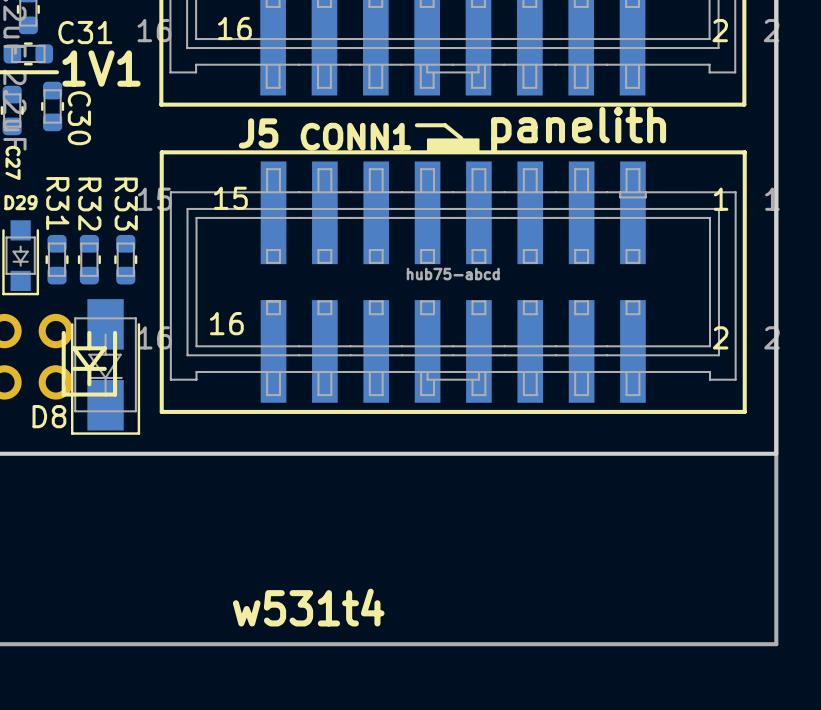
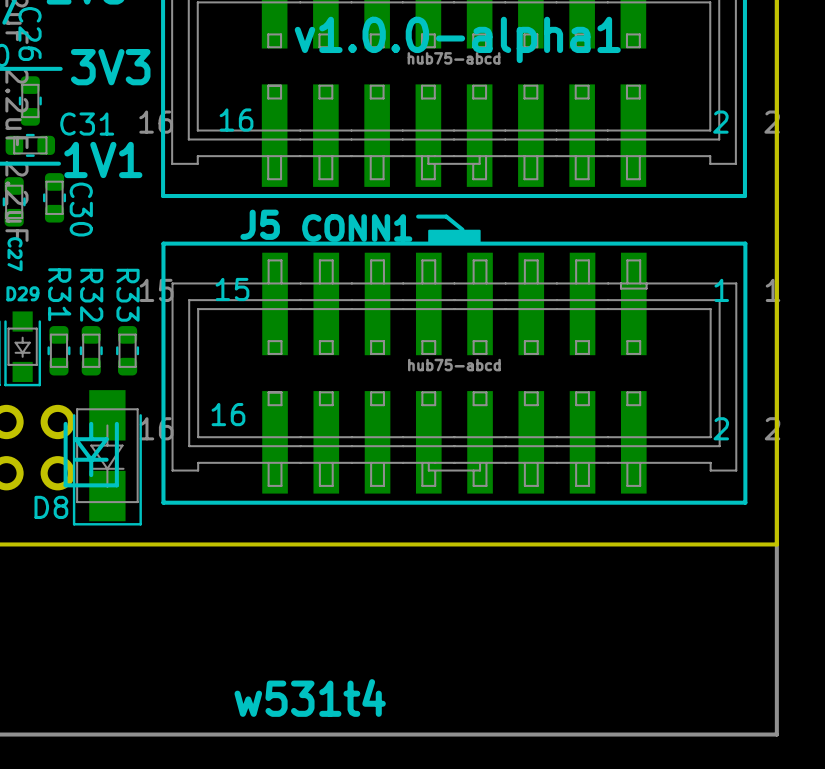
text: panelith (578, 130) -> none

